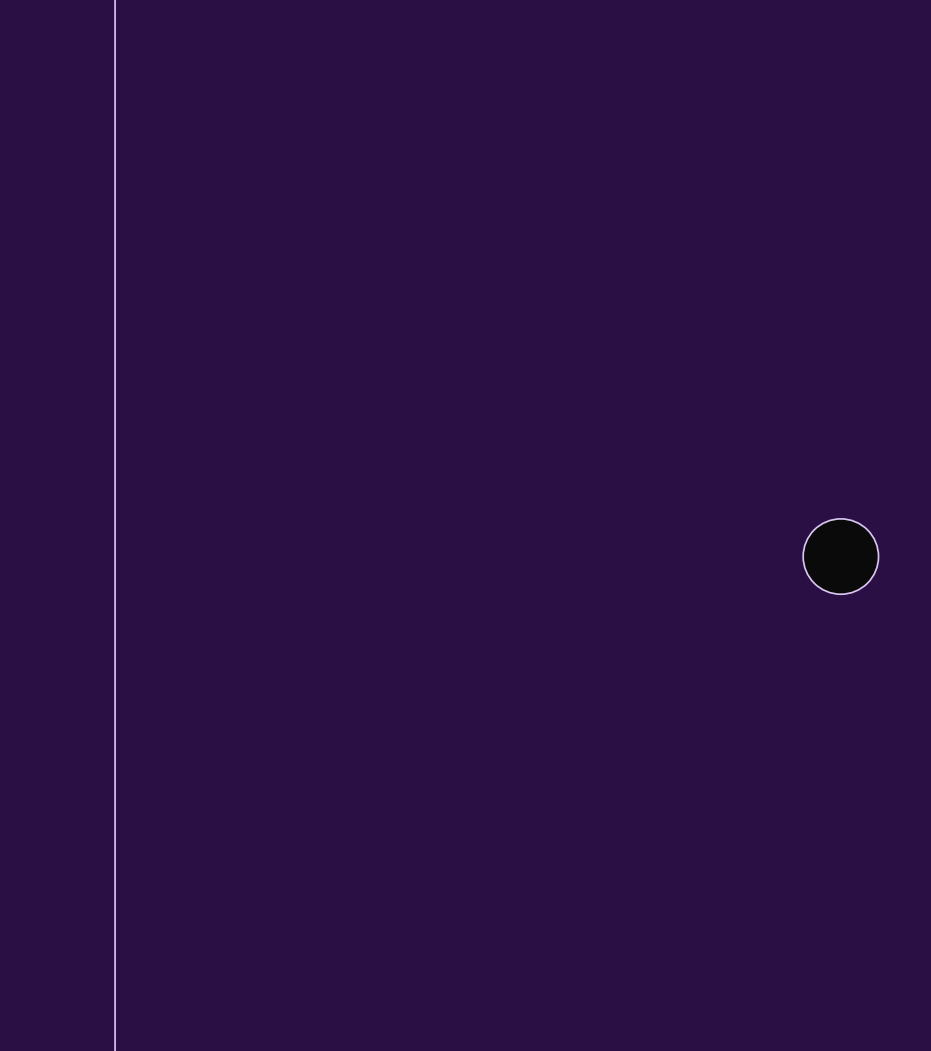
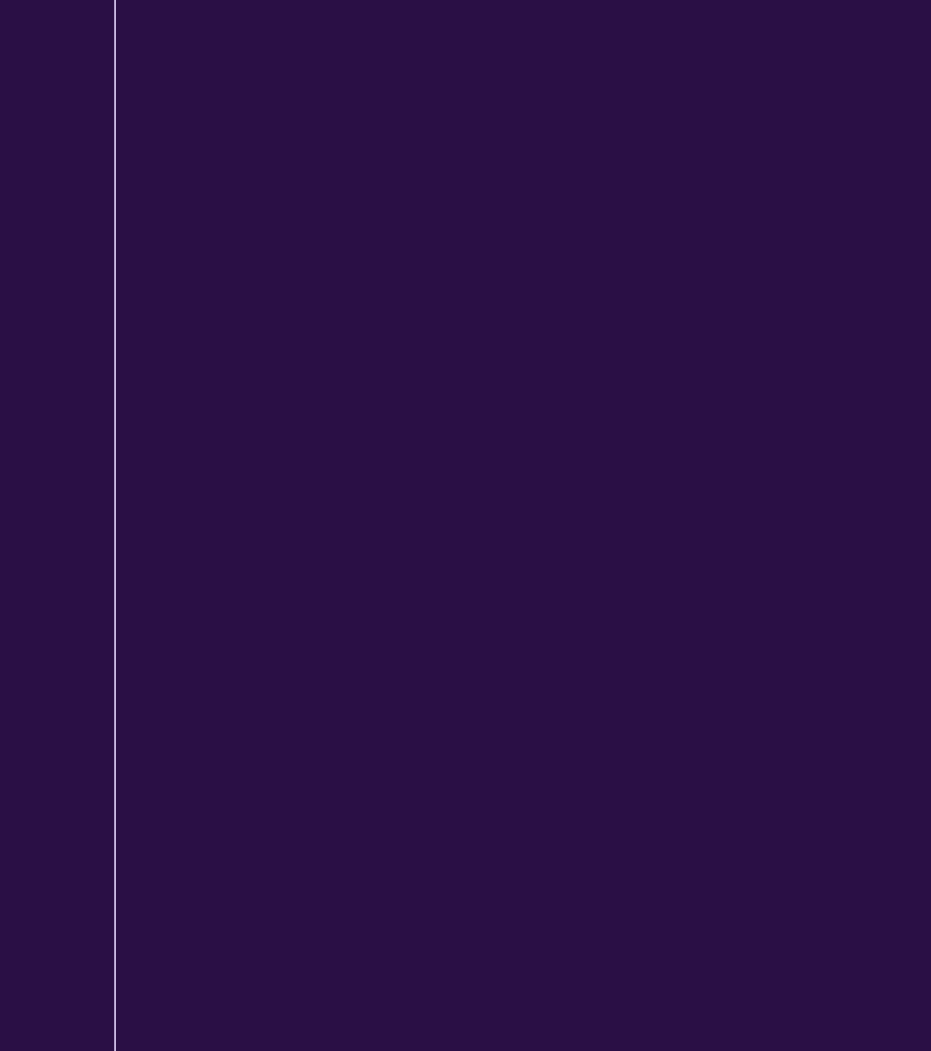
hole: (840, 556) -> none

